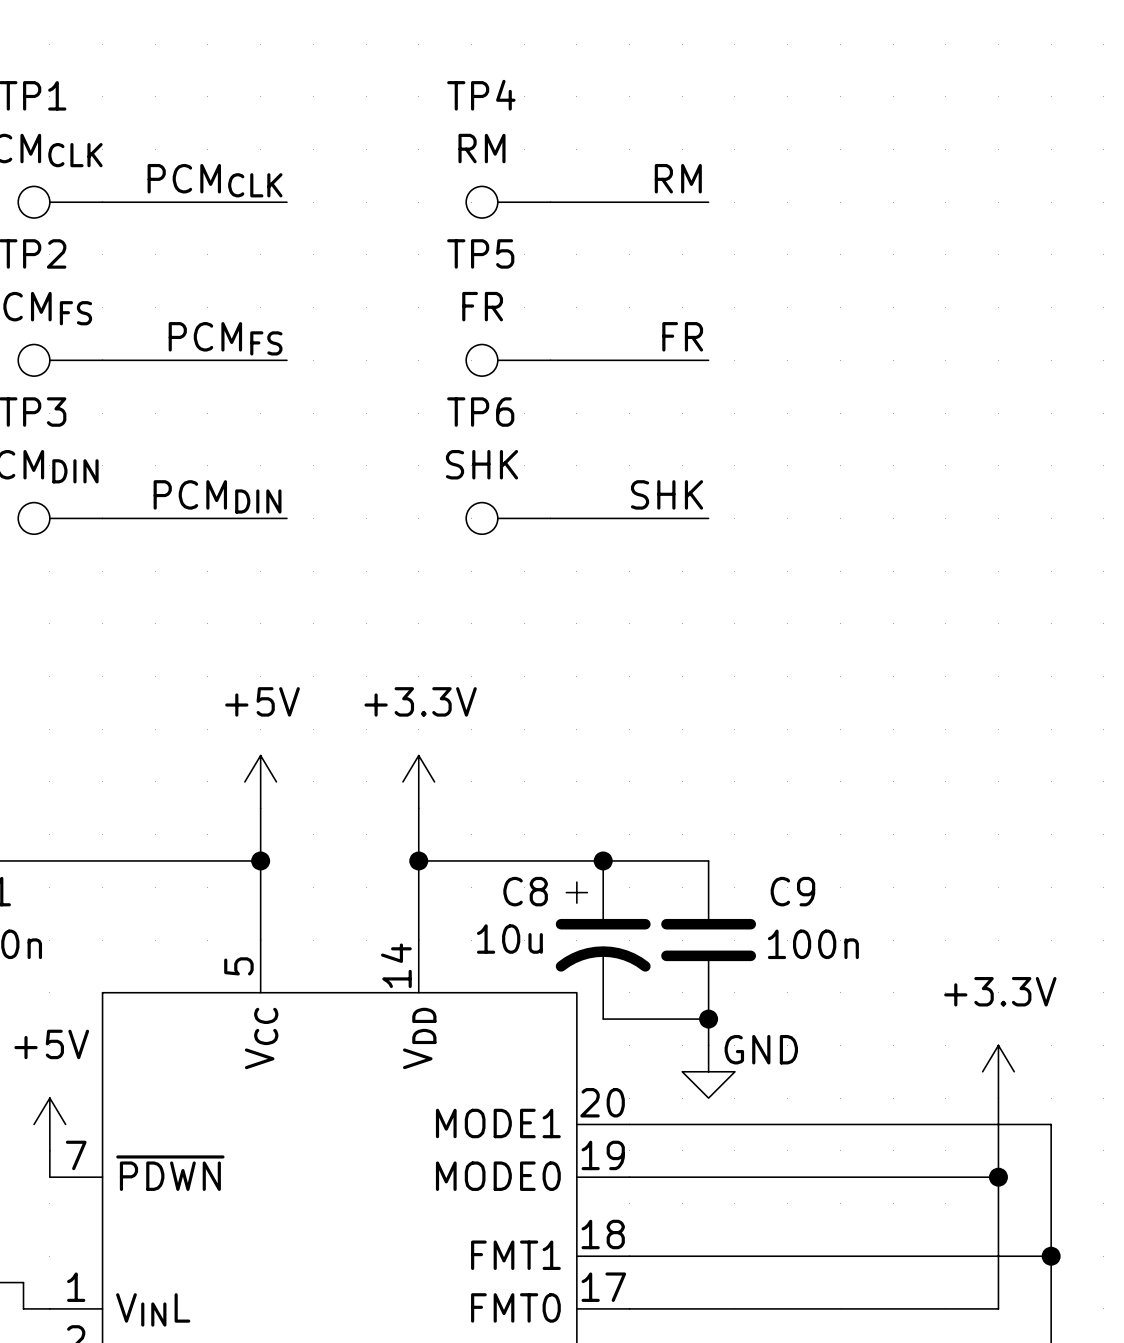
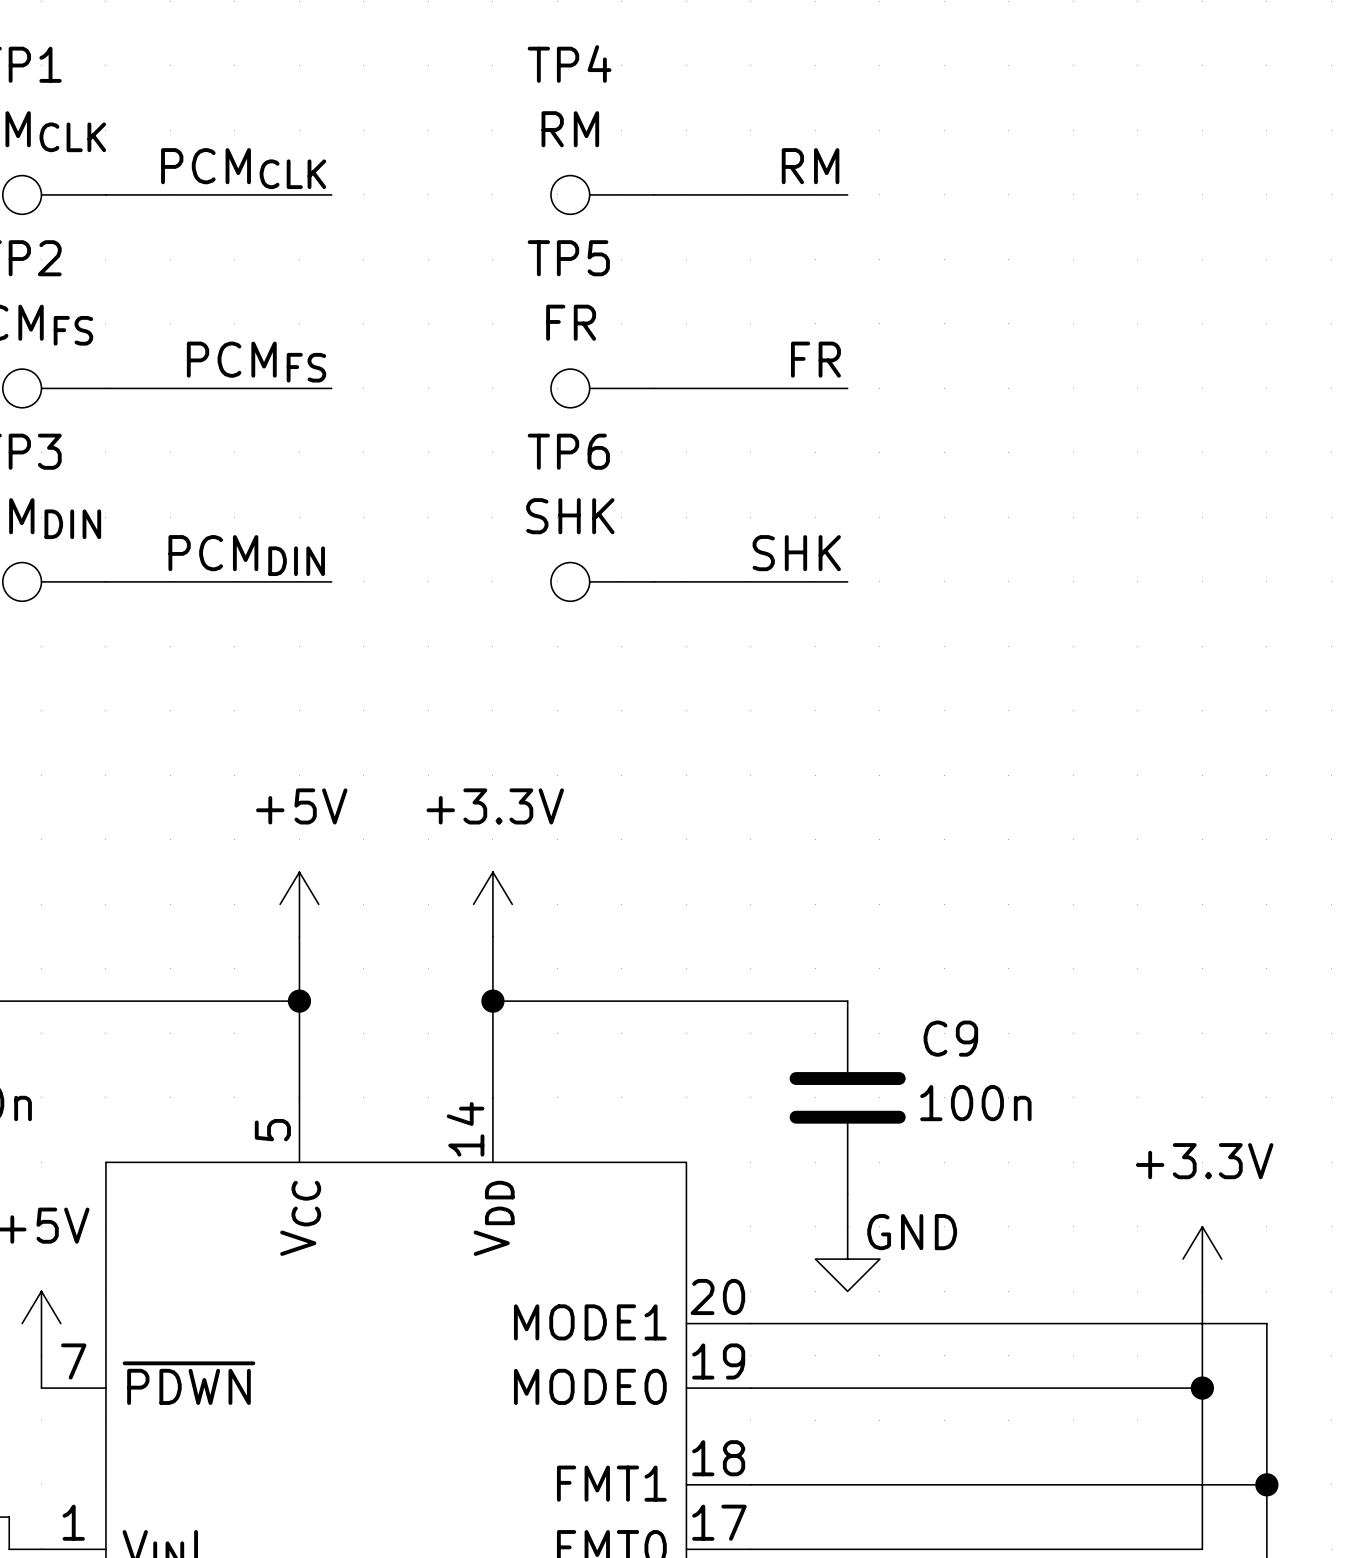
junction: (603, 860) -> none
C8: 10u (603, 940) -> none
wire: (603, 1019) (708, 1019) -> none
junction: (708, 1019) -> none

